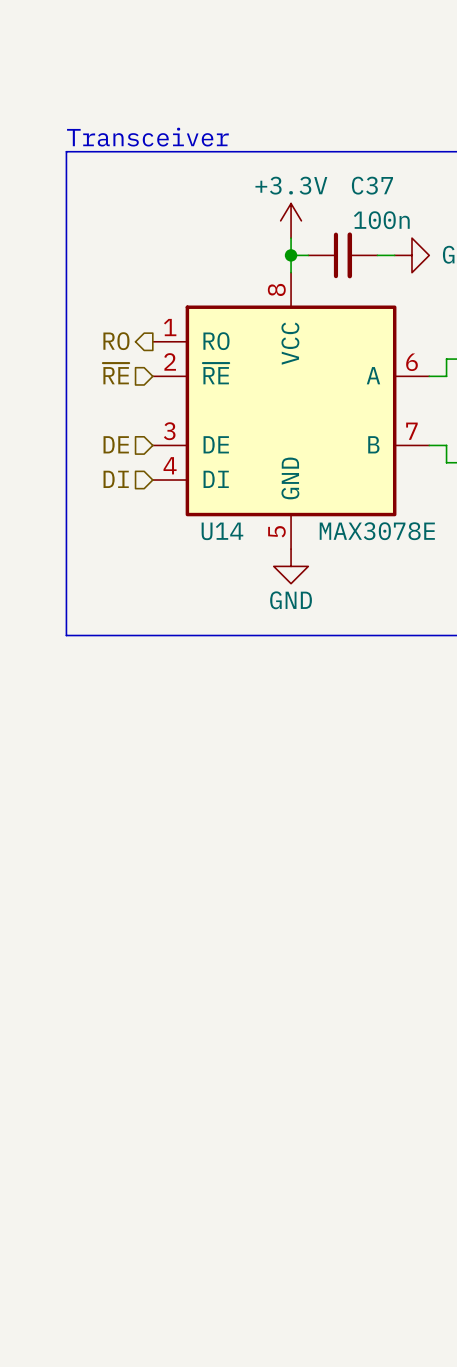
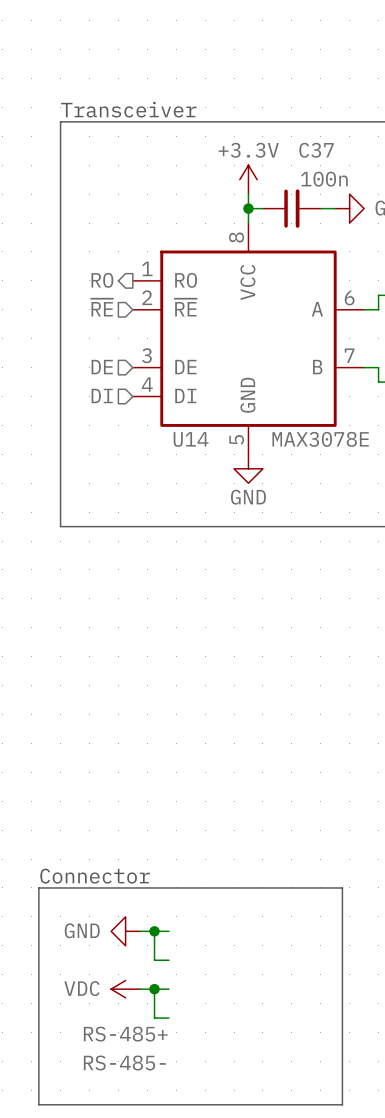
text: none -> Connector (95, 876)
line: none -> (38, 887) (38, 1104) (342, 1104) (342, 887) (38, 887)
power symbol: none -> GND (125, 931)
wire: none -> (140, 931) (168, 931)
wire: none -> (154, 931) (154, 960) (168, 960)
junction: none -> (154, 931)
power symbol: none -> VDC (125, 989)
wire: none -> (140, 989) (168, 989)
wire: none -> (154, 989) (154, 1018) (168, 1018)
junction: none -> (154, 989)
label: none -> RS-485+ (125, 1034)
label: none -> RS-485- (124, 1062)

